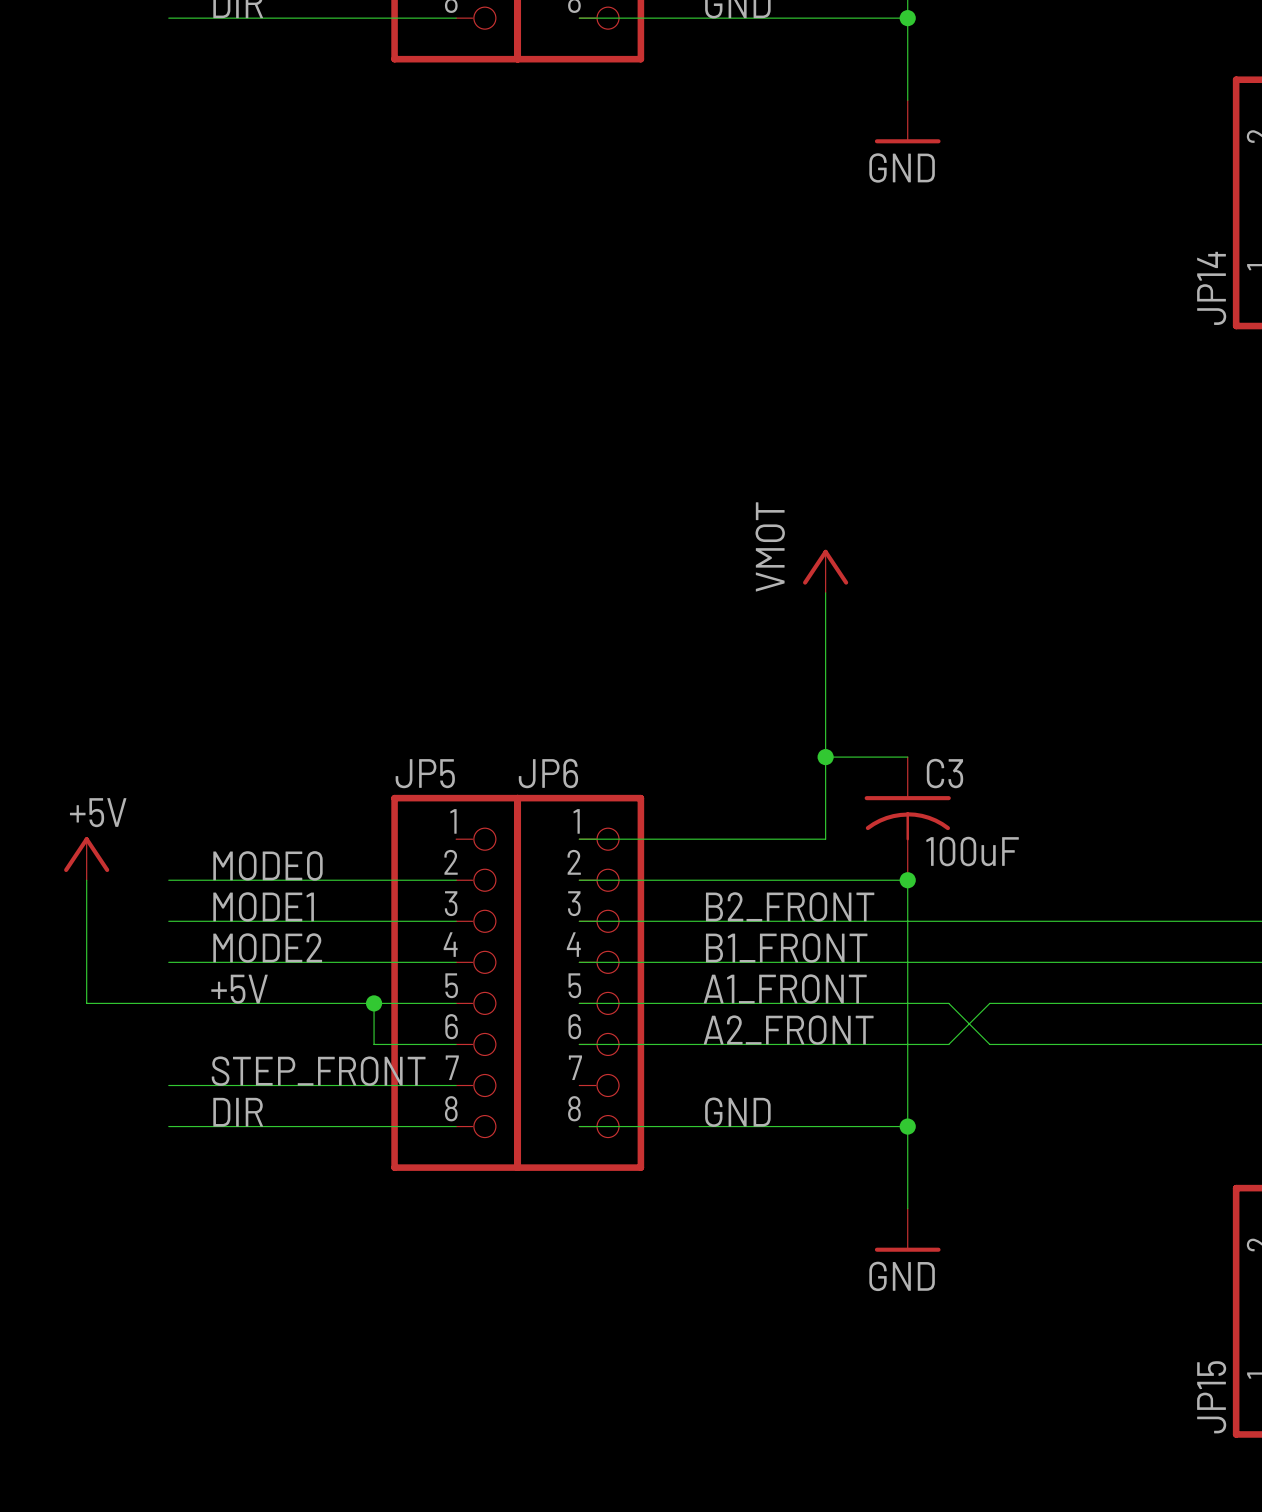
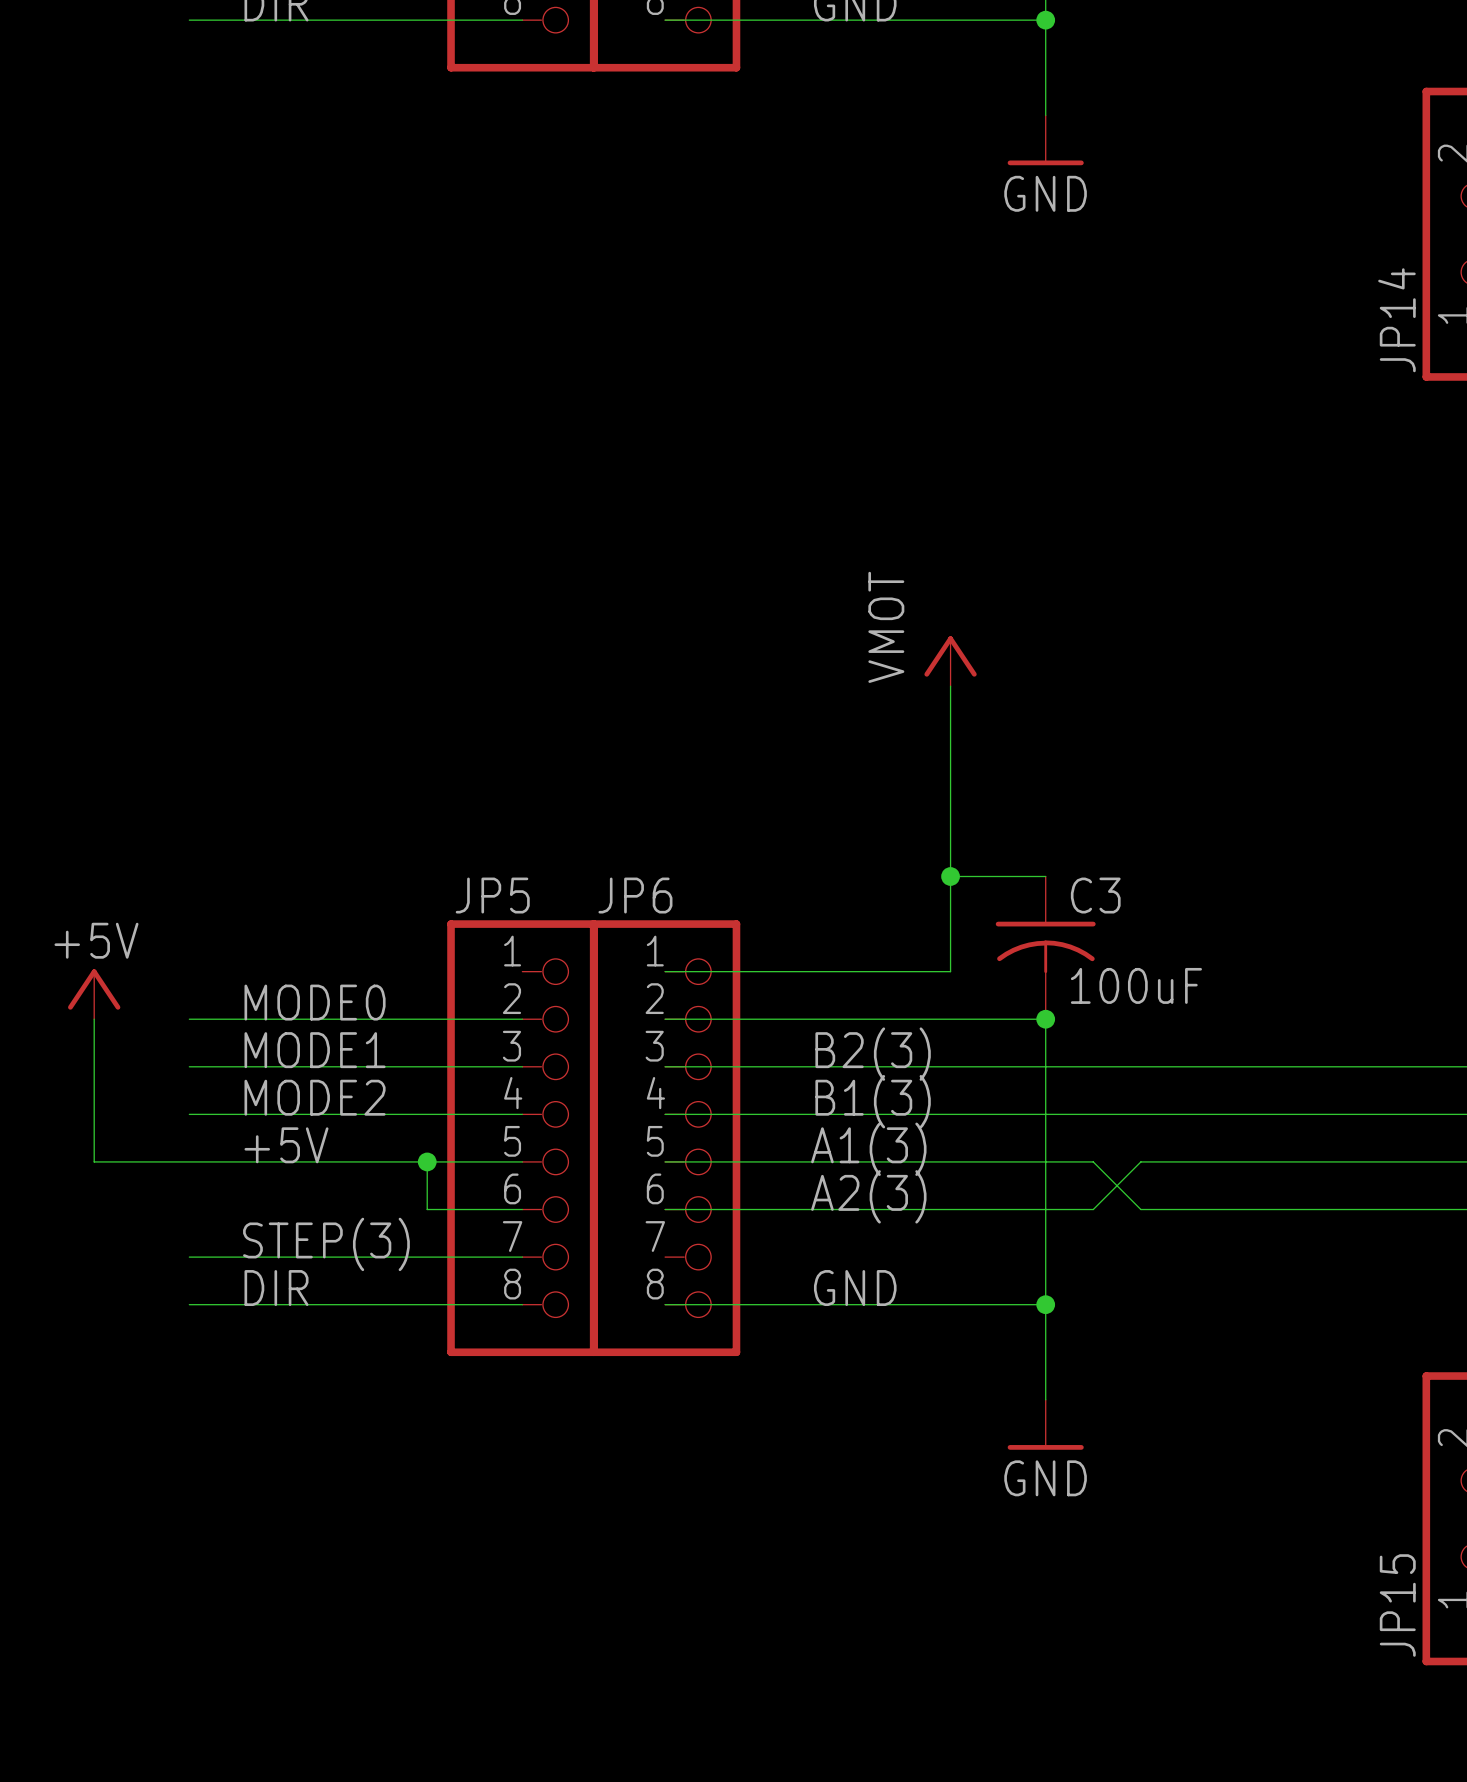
label: B2_FRONT (790, 906) -> B2(3) (873, 1054)
label: B1_FRONT (786, 947) -> B1(3) (873, 1101)
label: A1_FRONT (785, 989) -> A1(3) (868, 1149)
label: A2_FRONT (788, 1030) -> A2(3) (868, 1196)
label: STEP_FRONT (318, 1071) -> STEP(3) (326, 1244)

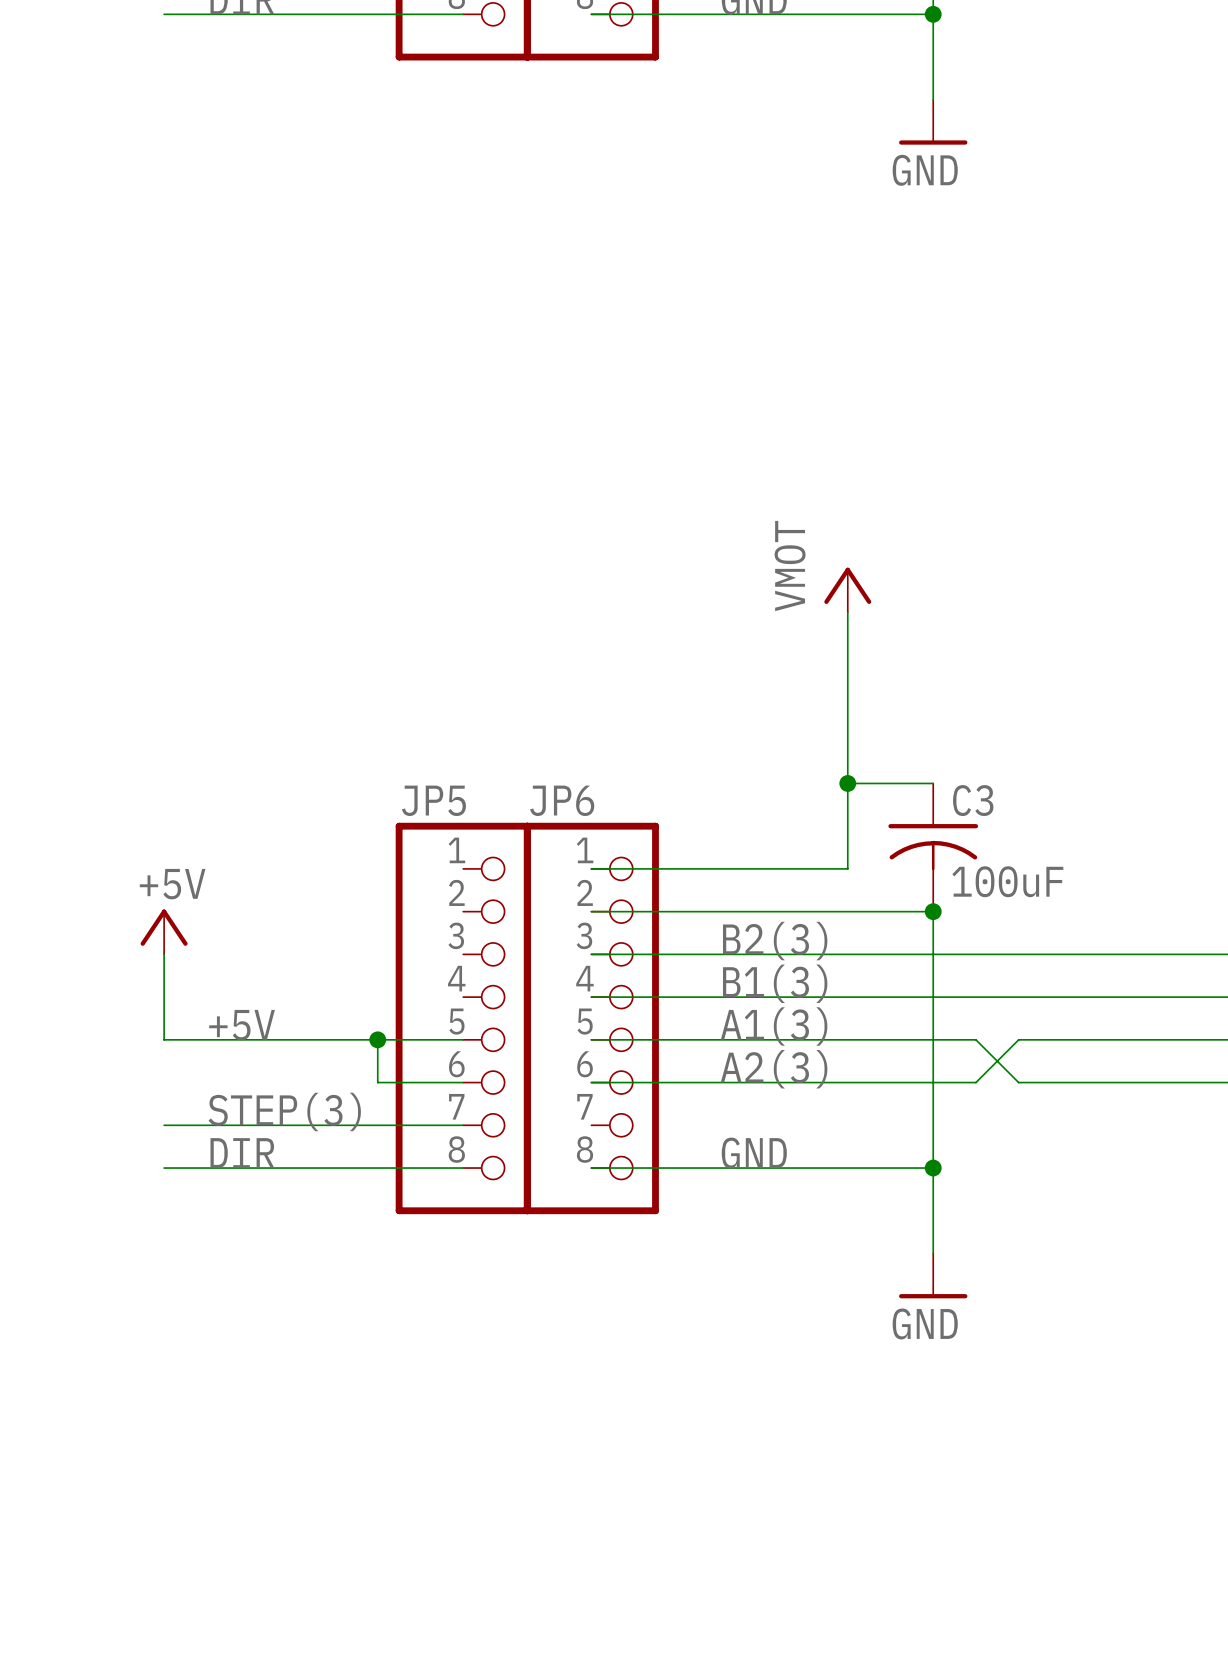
power symbol position: +5V (94, 994) -> +5V (164, 931)
label: MODE0 (315, 1002) -> none
wire: (94, 1019) (94, 1161) (189, 1161) -> (164, 954) (164, 1039)
wire: (189, 1019) (522, 1019) -> none
label: MODE1 (315, 1050) -> none
wire: (189, 1066) (522, 1066) -> none
label: MODE2 (315, 1097) -> none
wire: (189, 1114) (522, 1114) -> none

